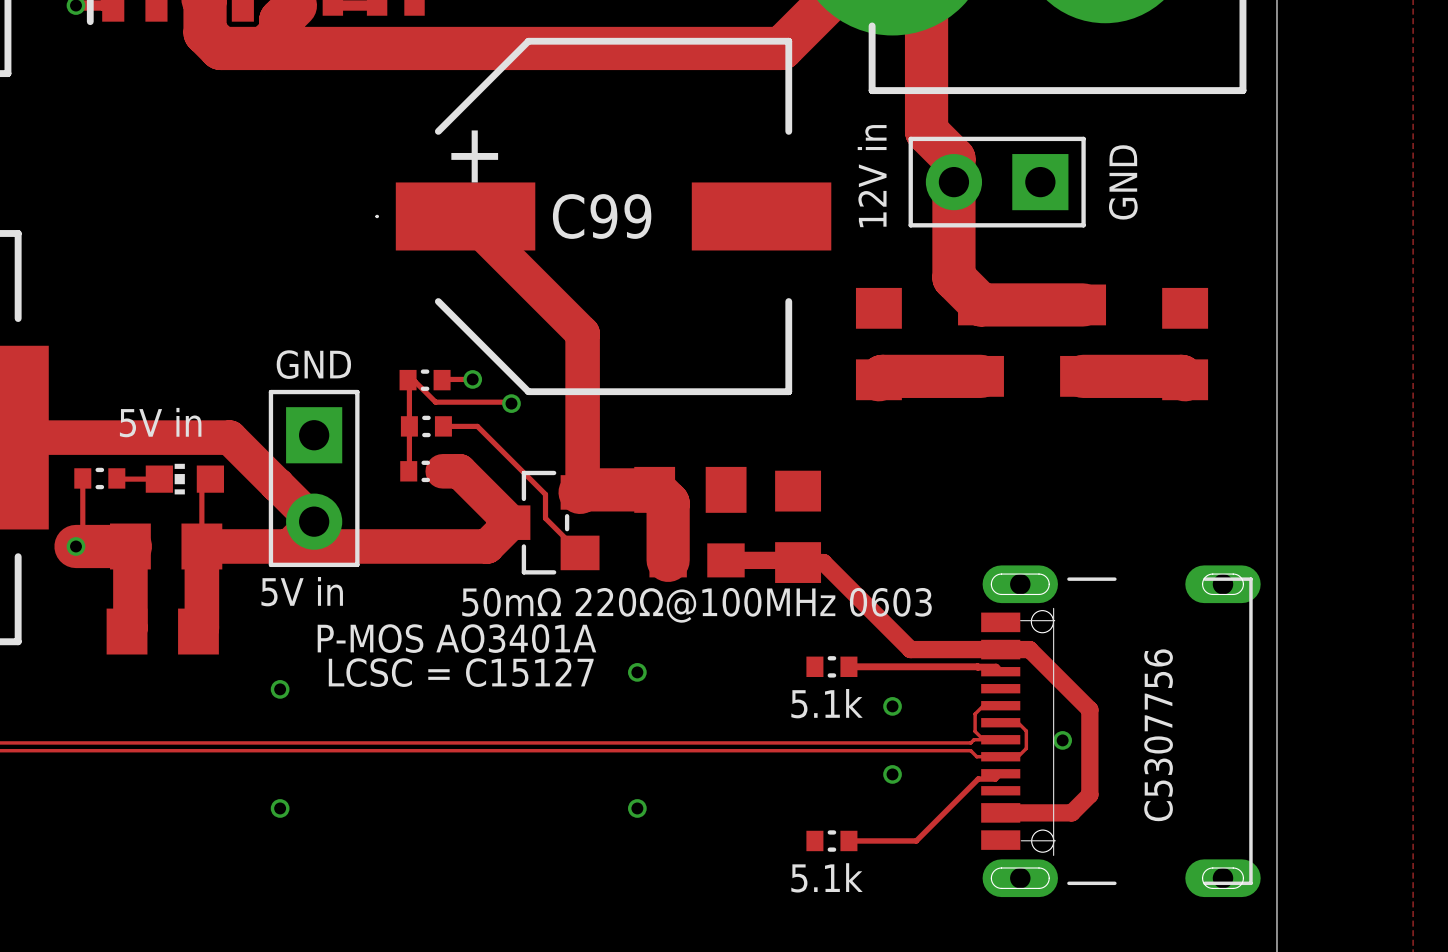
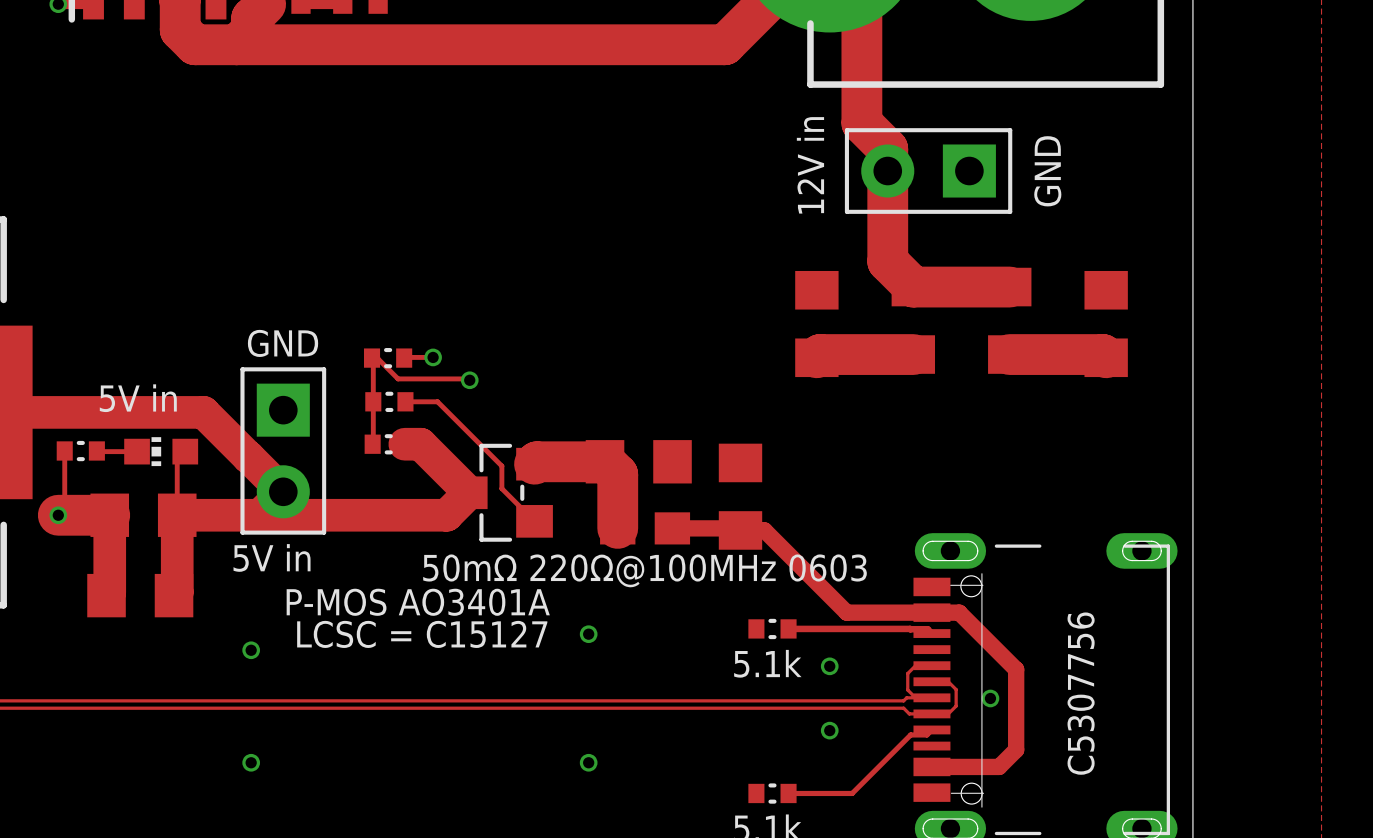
text: + (474, 156) -> none
track: (465, 216) (582, 333) (582, 489) -> none
C99: (603, 216) -> none

